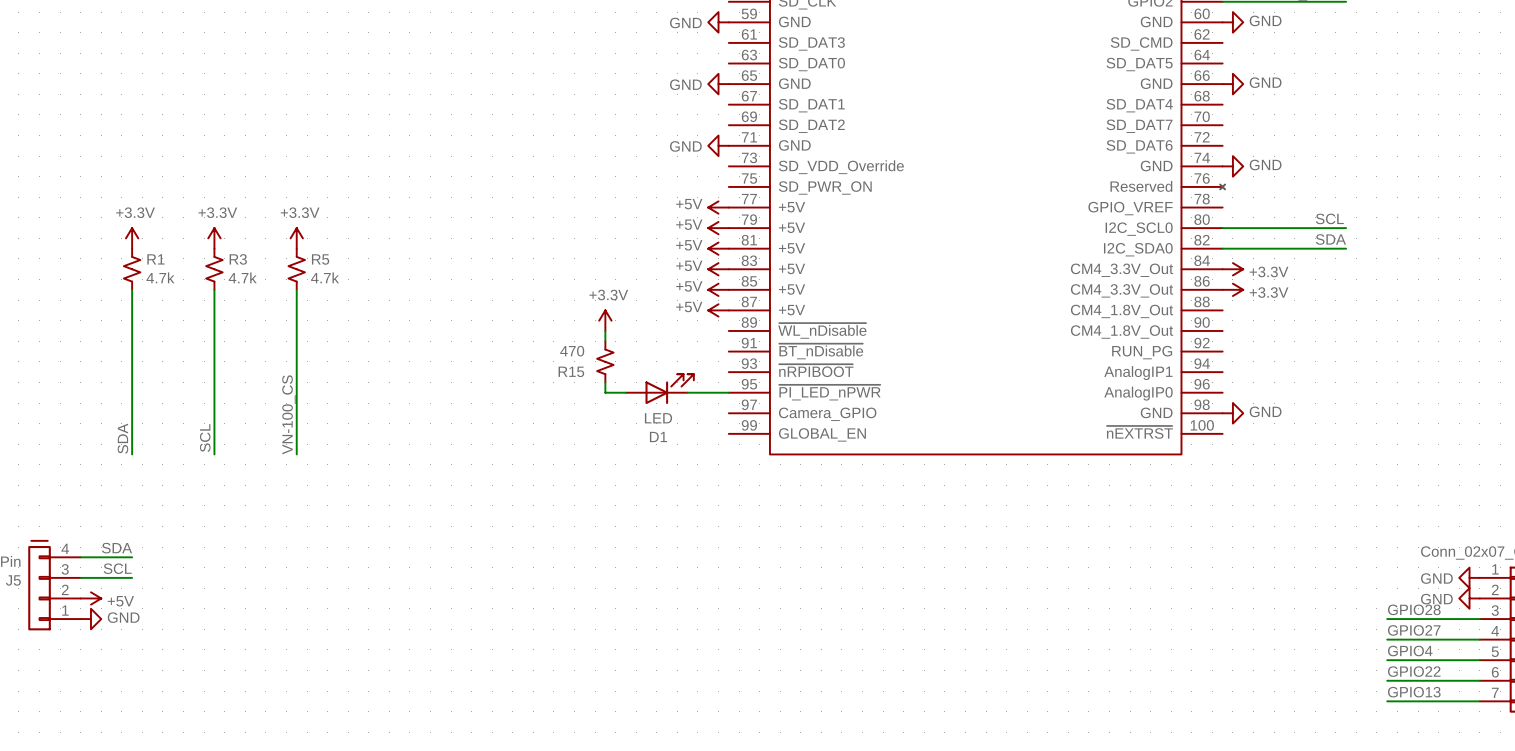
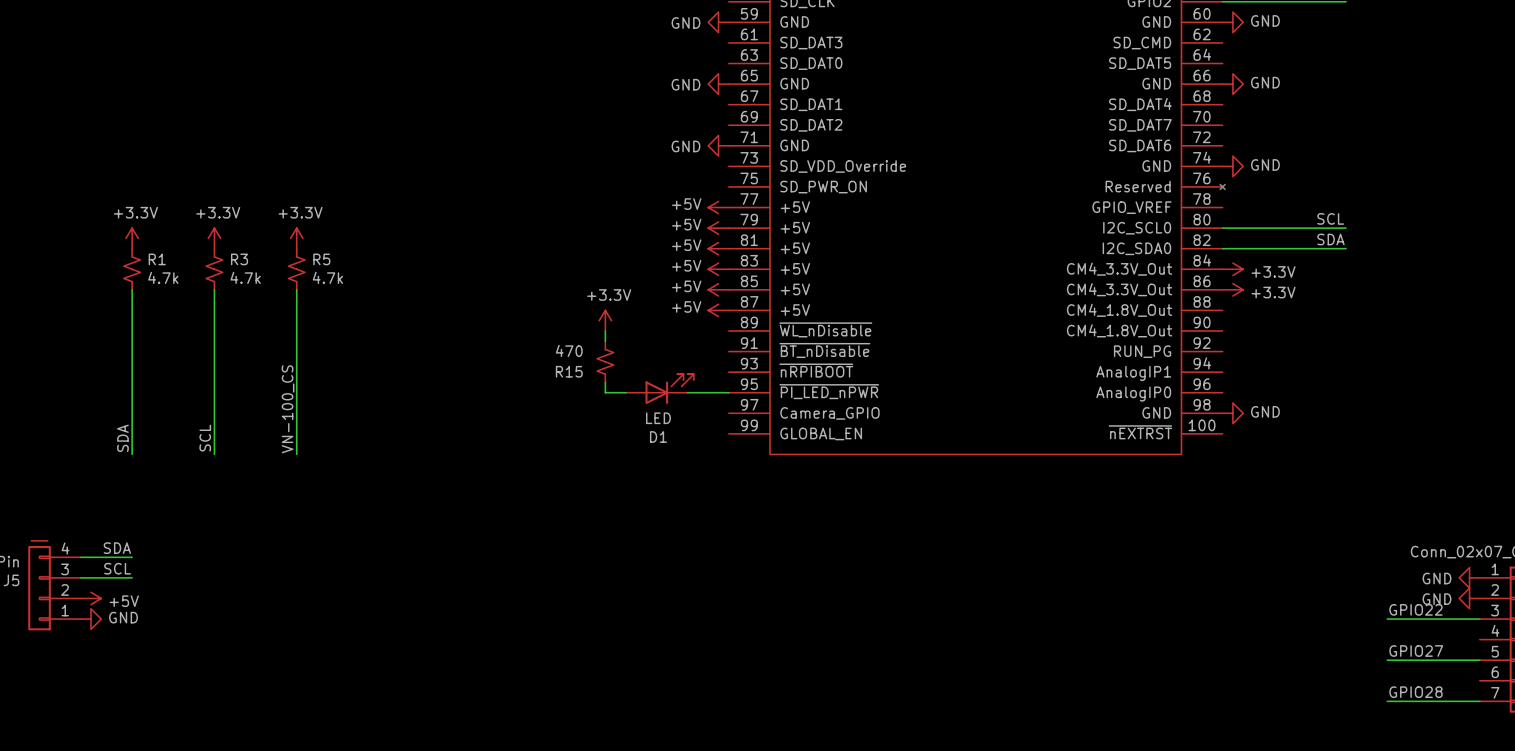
label: GPIO28 (1414, 609) -> GPIO22 (1415, 609)
label: GPIO27 (1414, 630) -> none
wire: (1387, 639) (1479, 639) -> none
label: GPIO4 (1410, 651) -> GPIO27 (1416, 651)
label: GPIO22 (1414, 671) -> none
wire: (1387, 680) (1479, 680) -> none
label: GPIO13 (1414, 692) -> GPIO28 (1415, 692)

